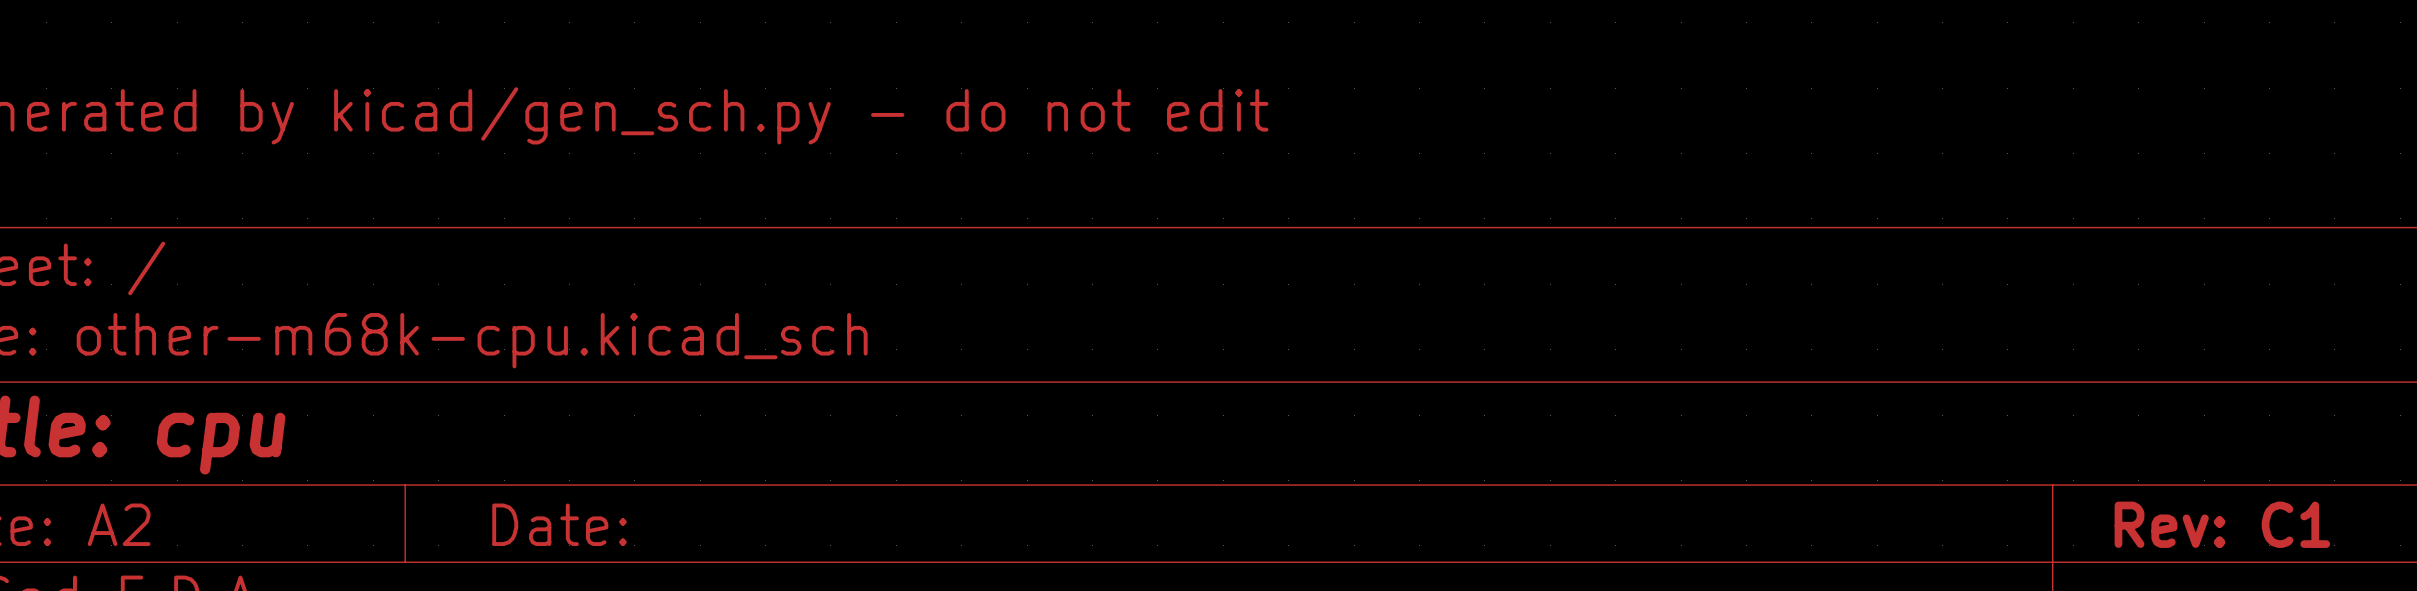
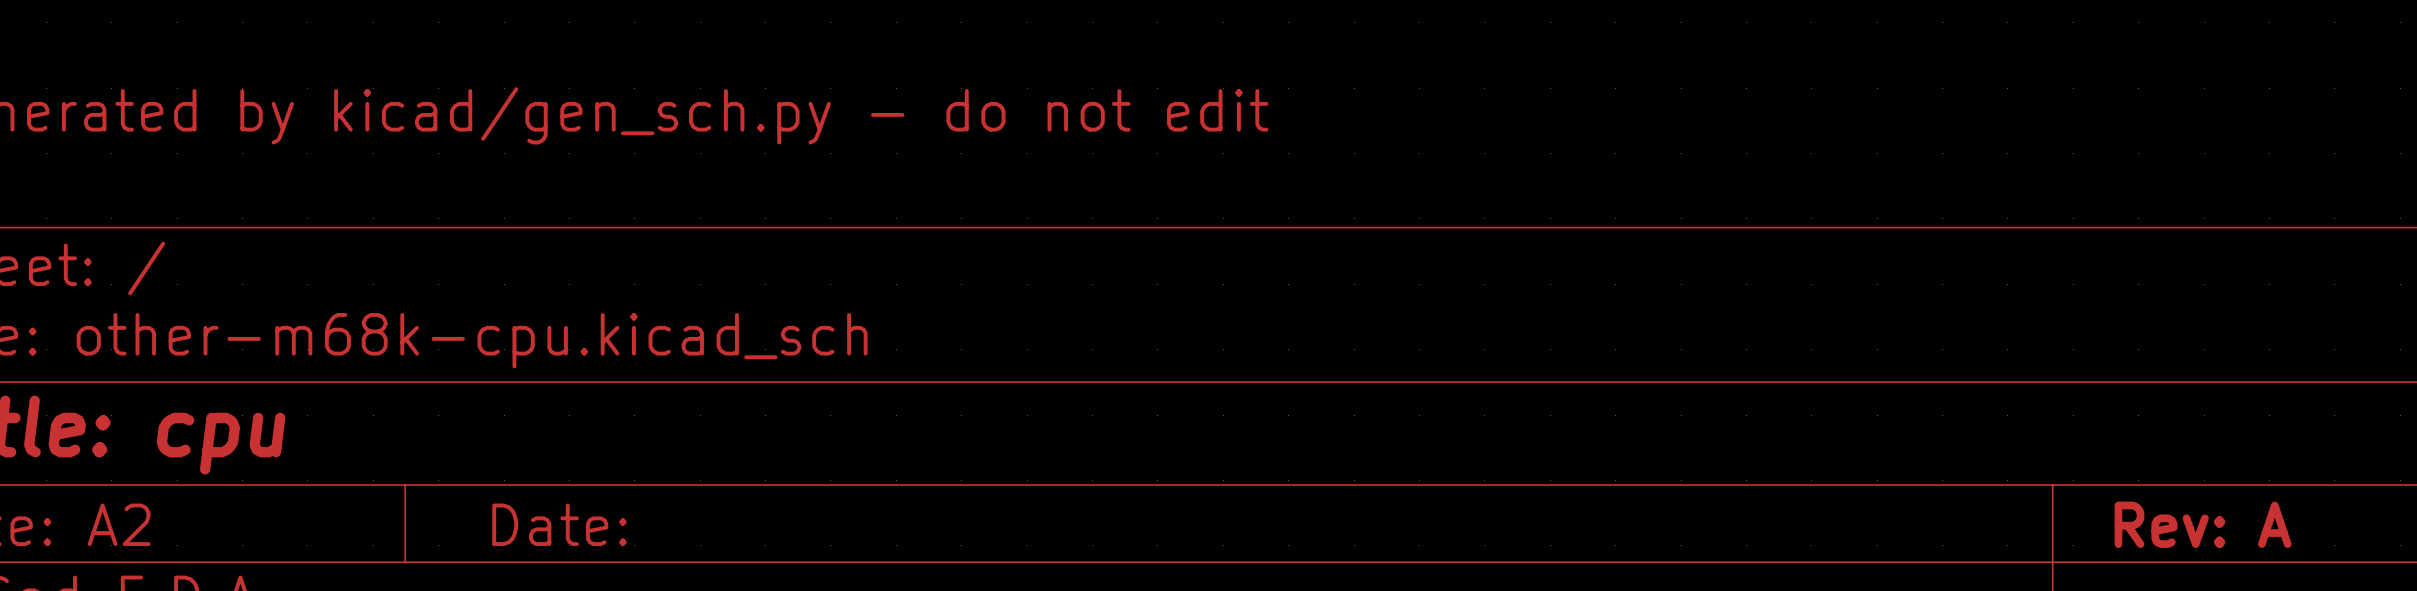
title block: Rev: C1 (2222, 524) -> Rev: A (2203, 524)

